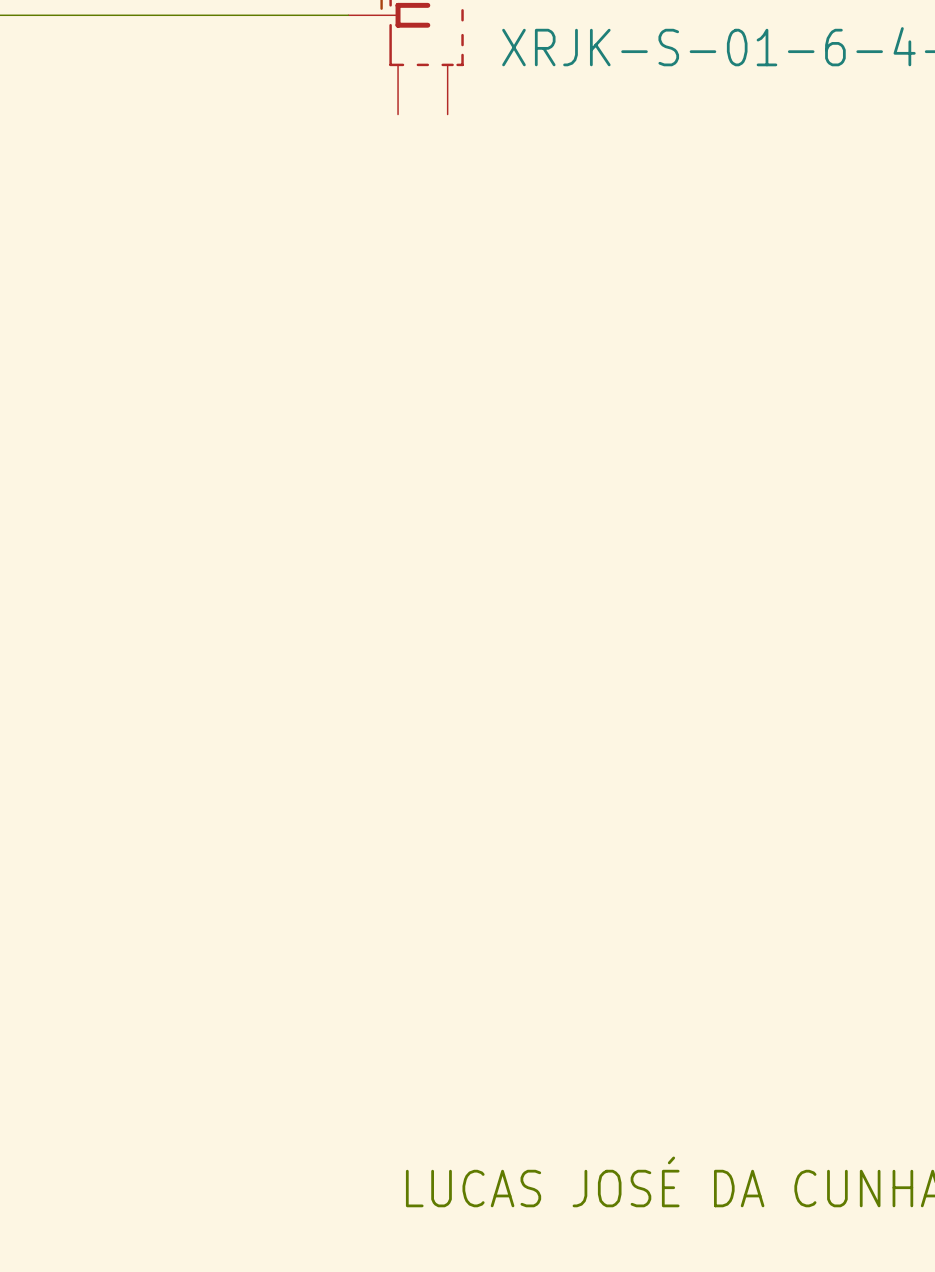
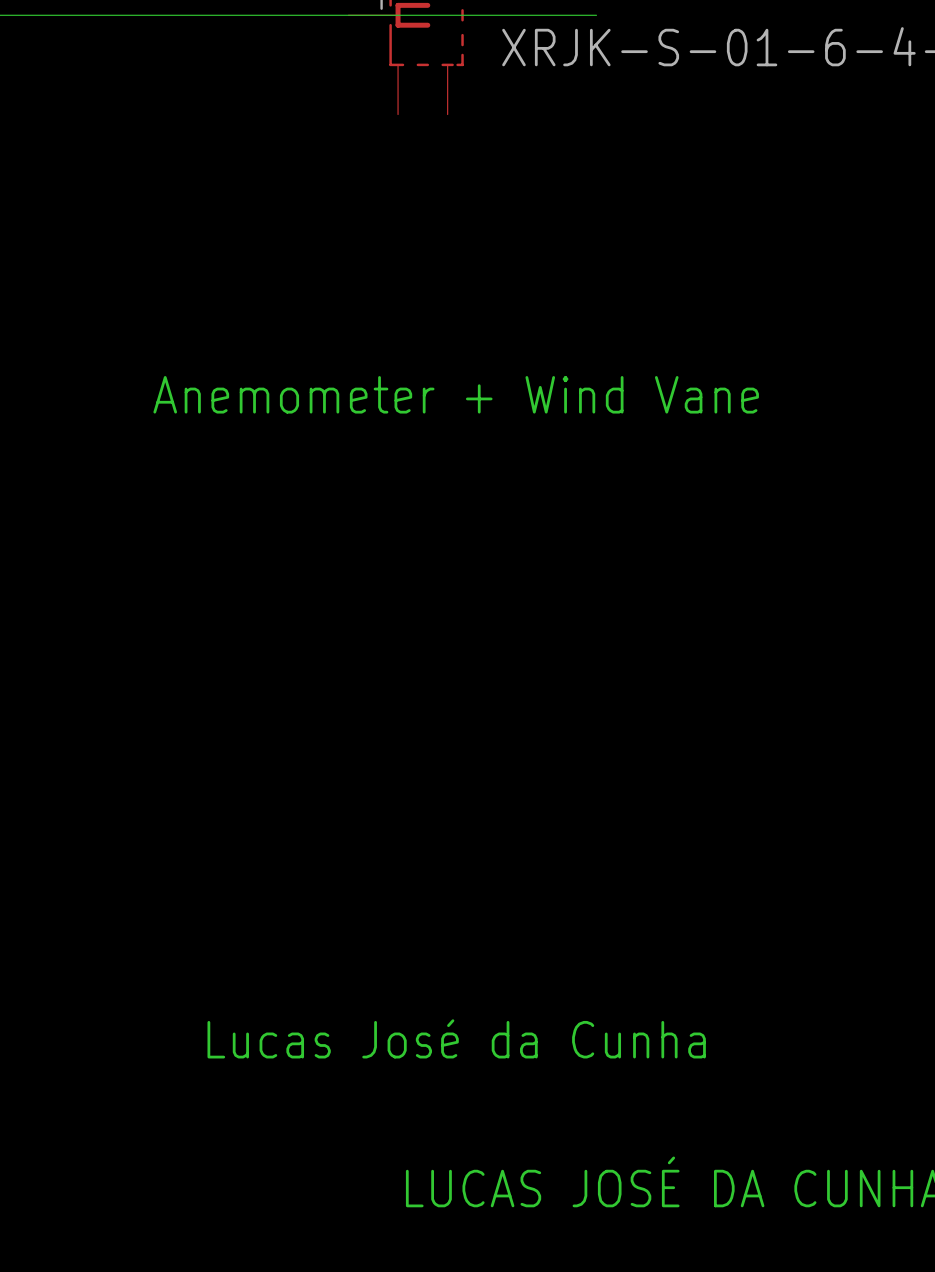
wire: none -> (348, 15) (596, 15)
text: none -> Anemometer + Wind Vane (456, 394)
text: none -> Lucas José da Cunha (456, 1038)

